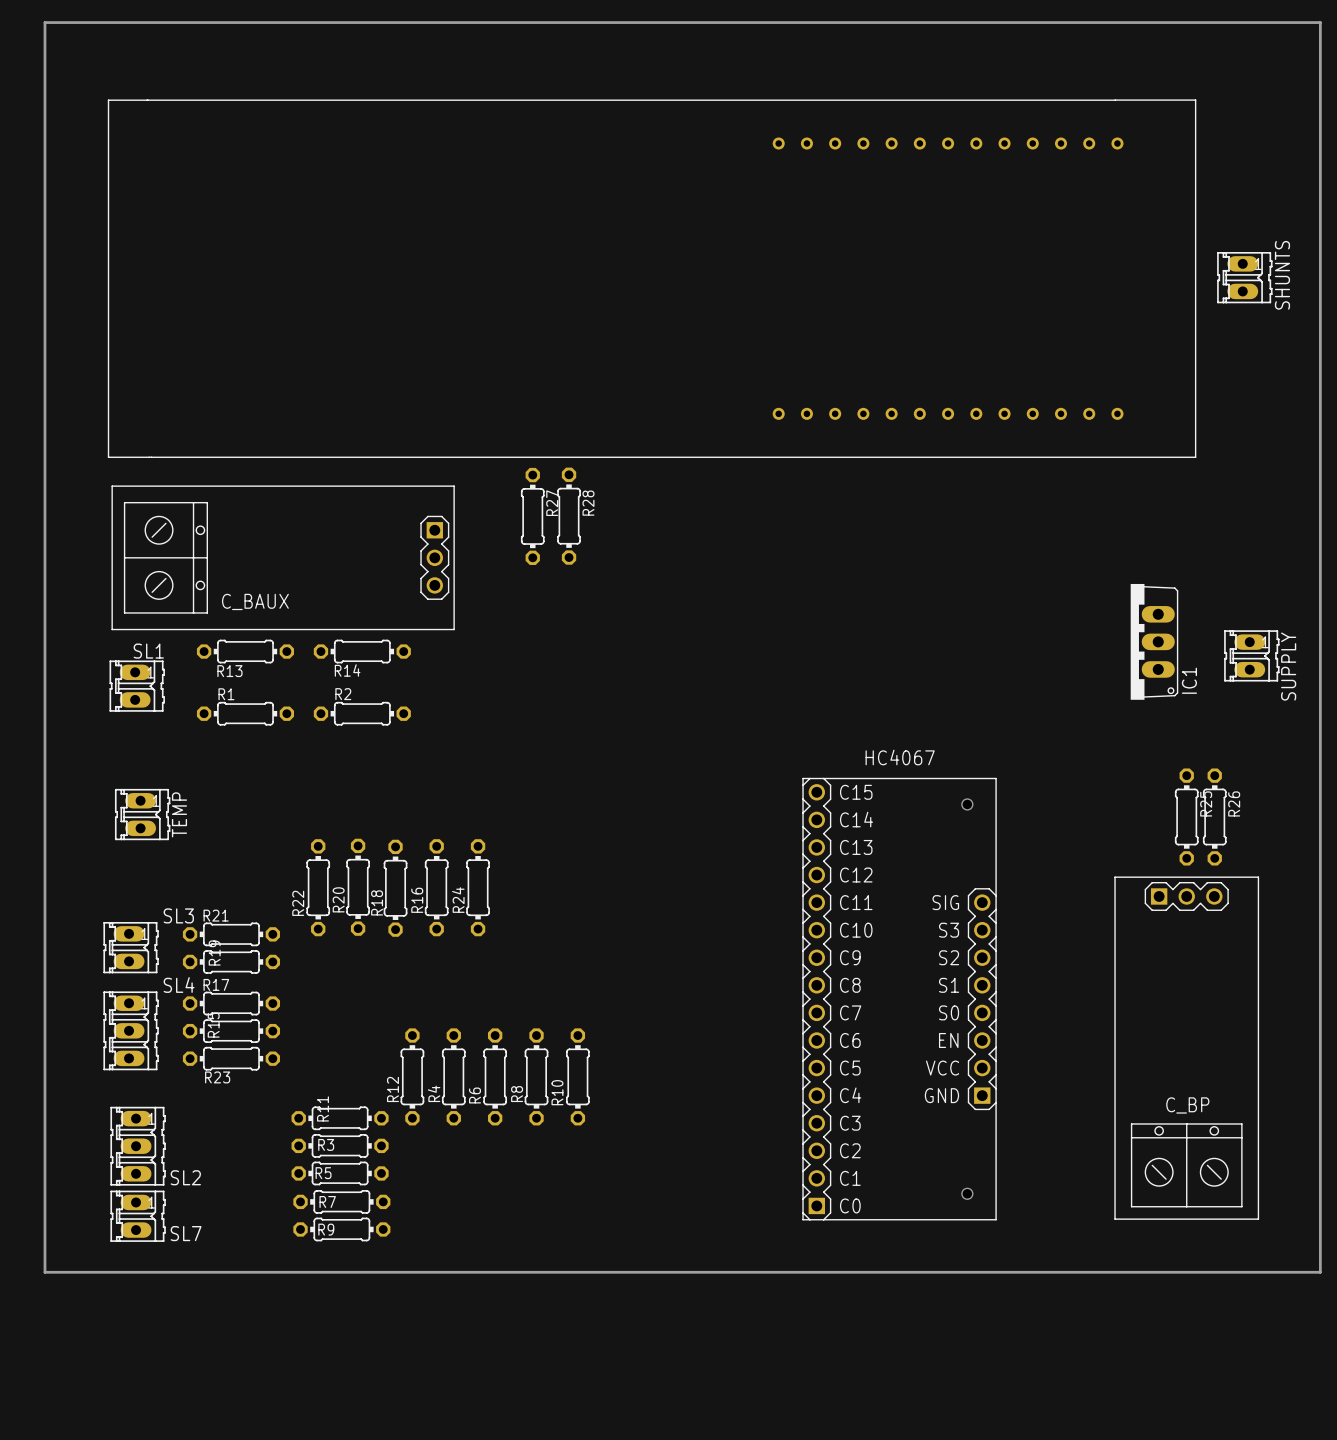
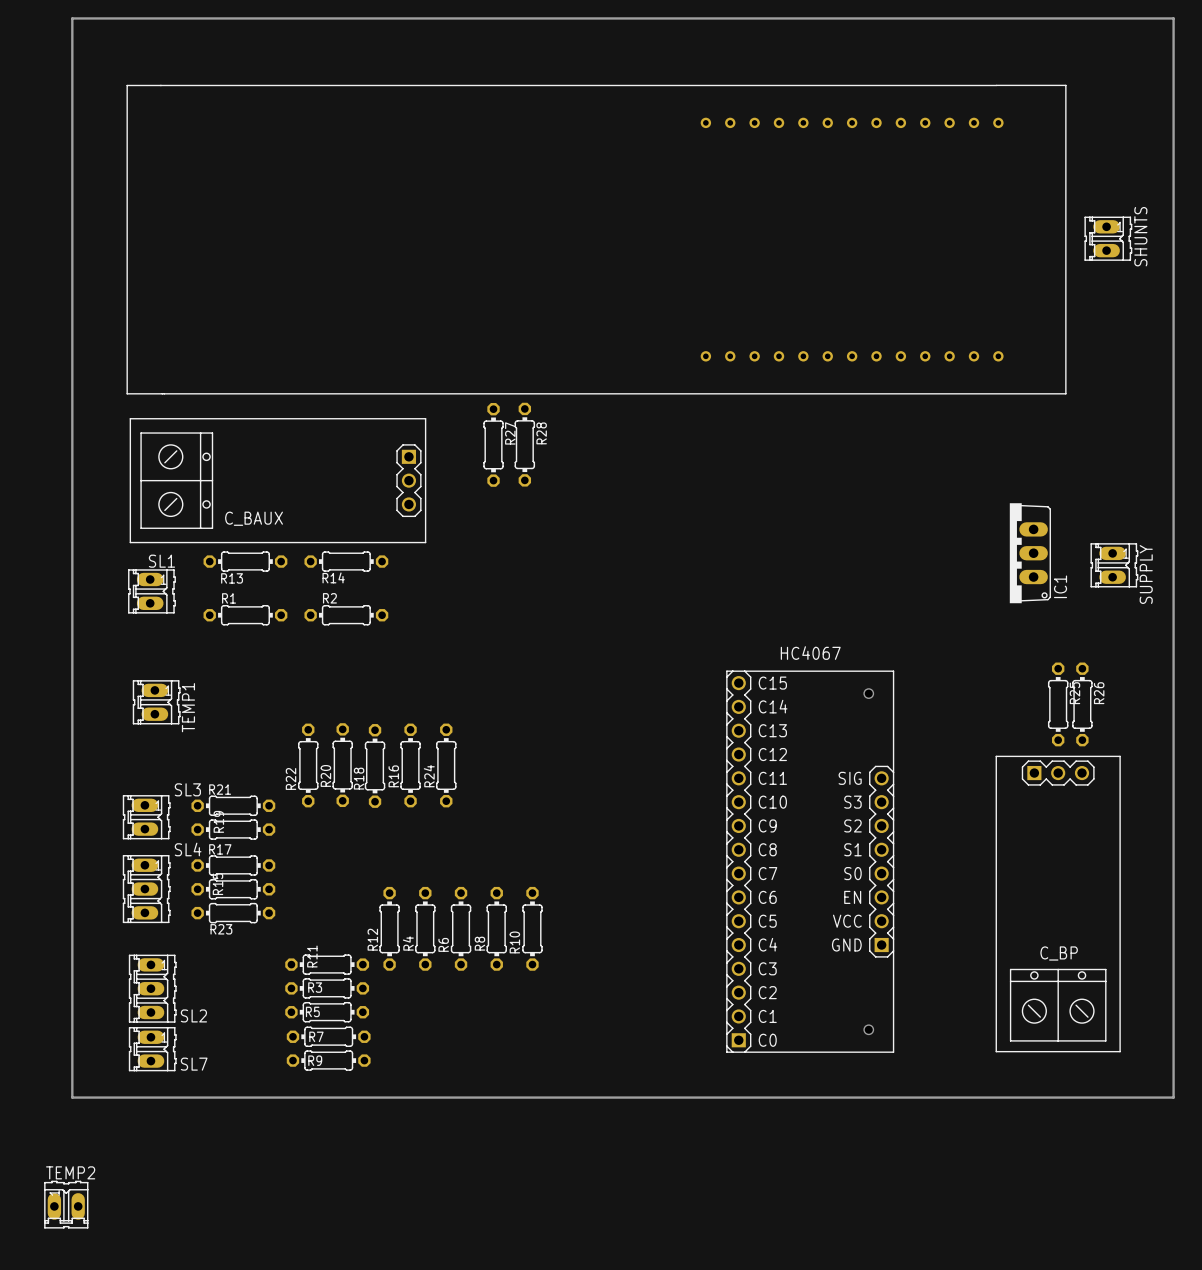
TEMP name: TEMP (179, 814) -> TEMP1 (188, 707)
TEMP2: none -> (66, 1204)

